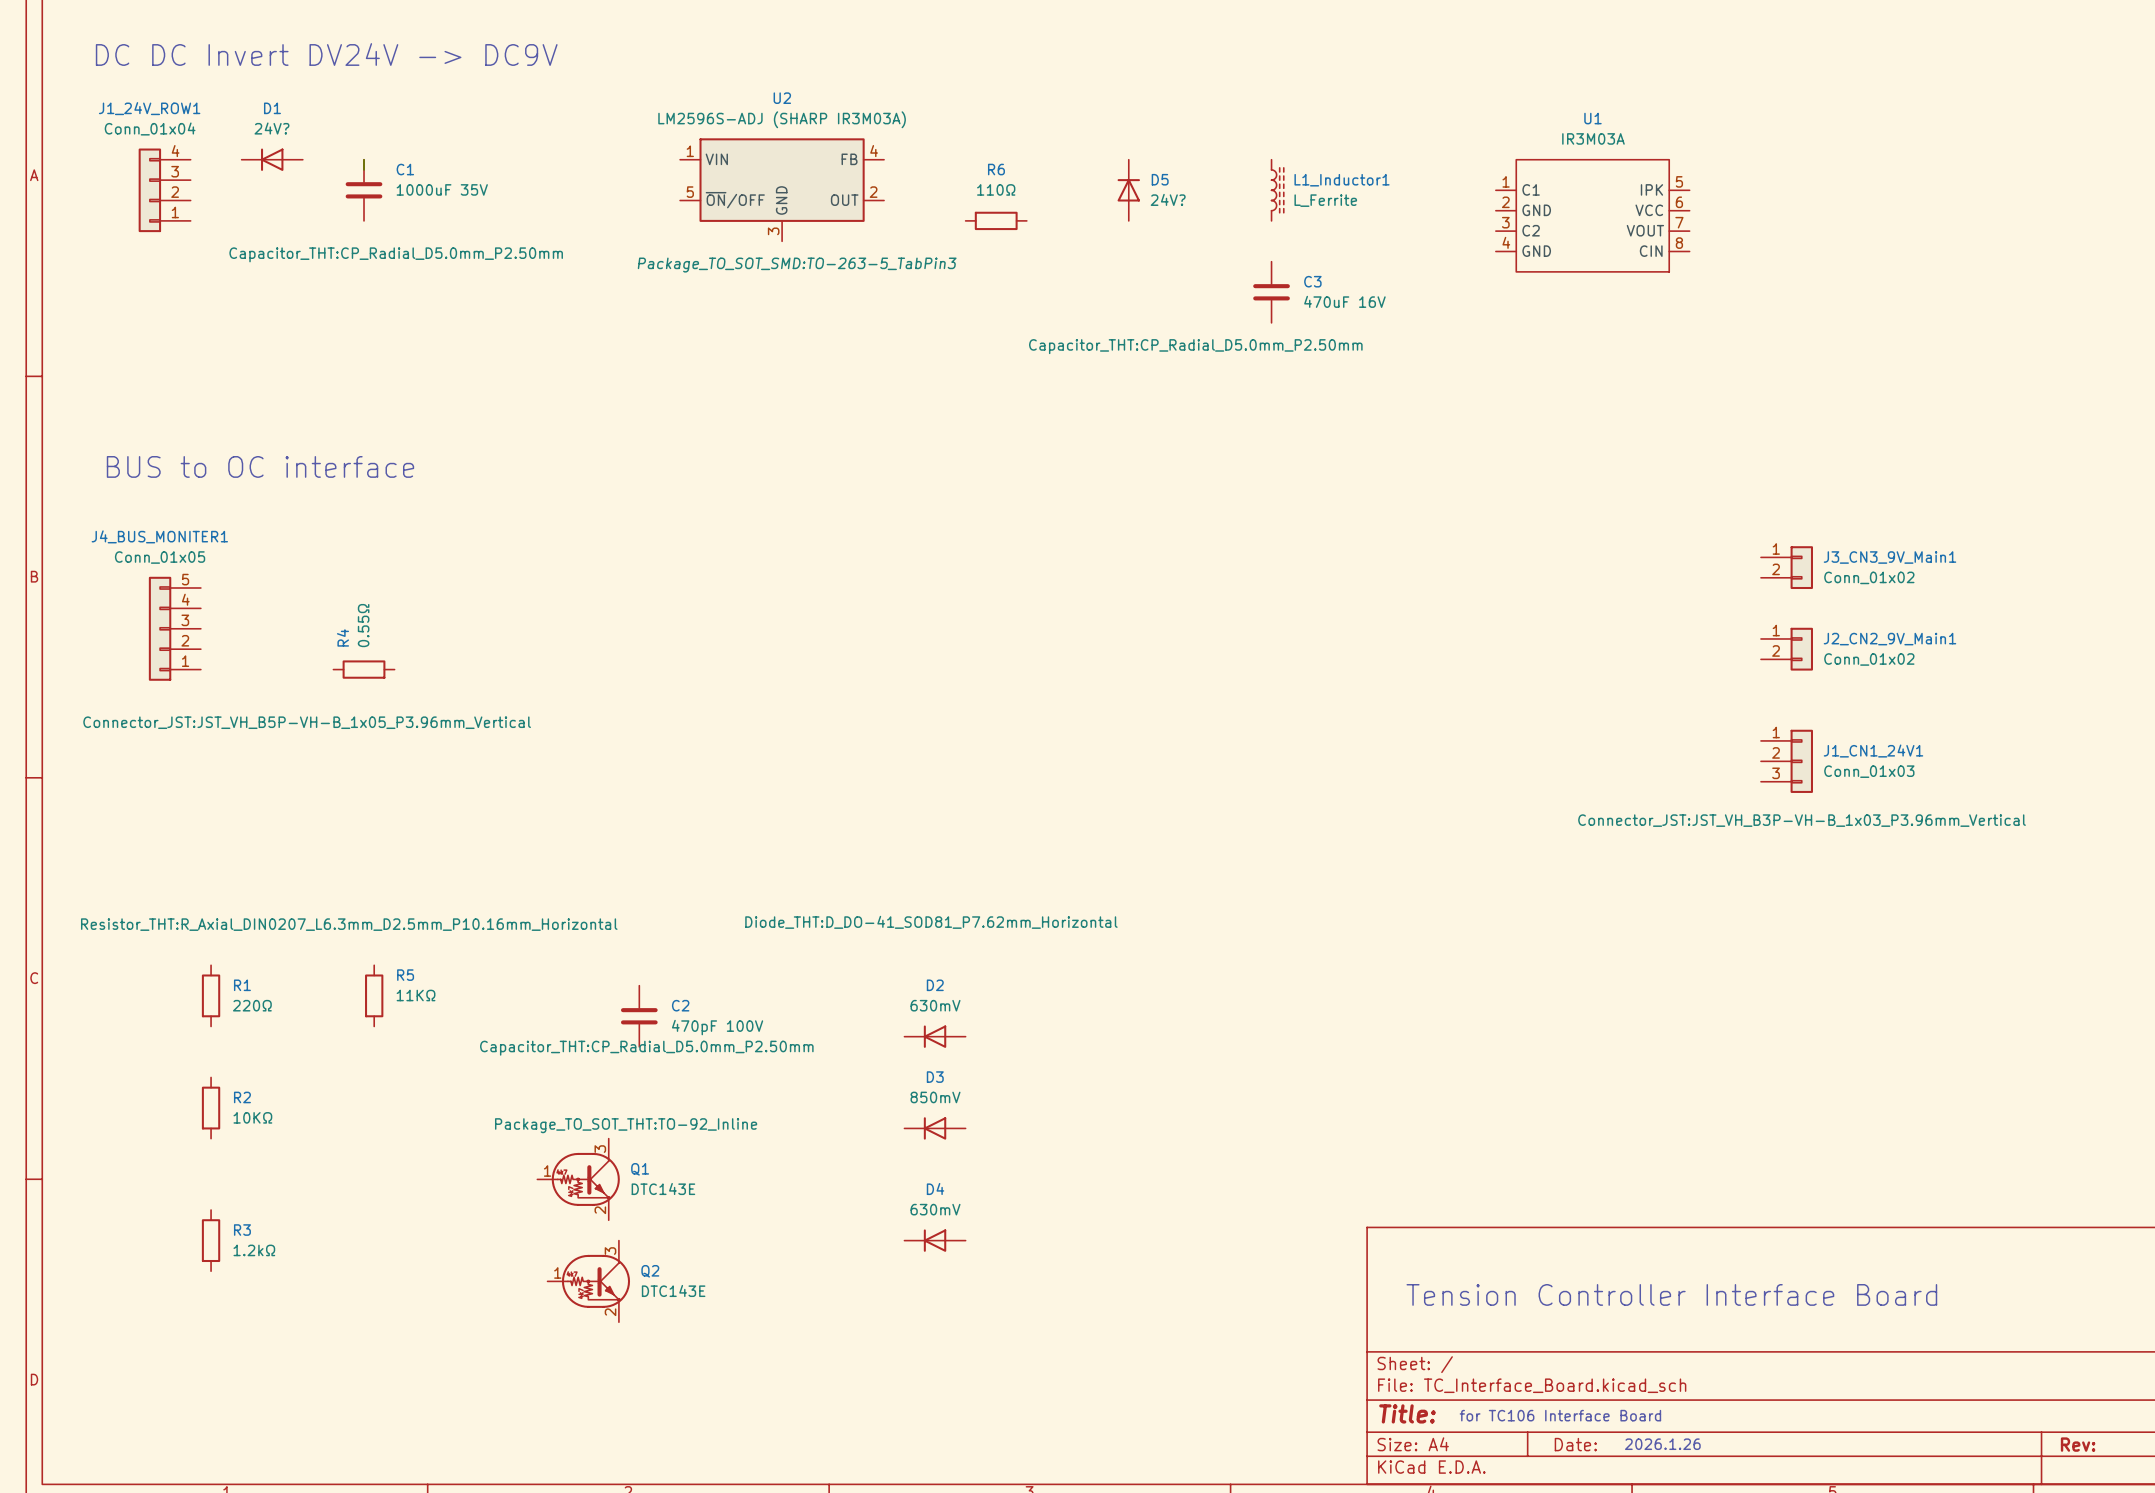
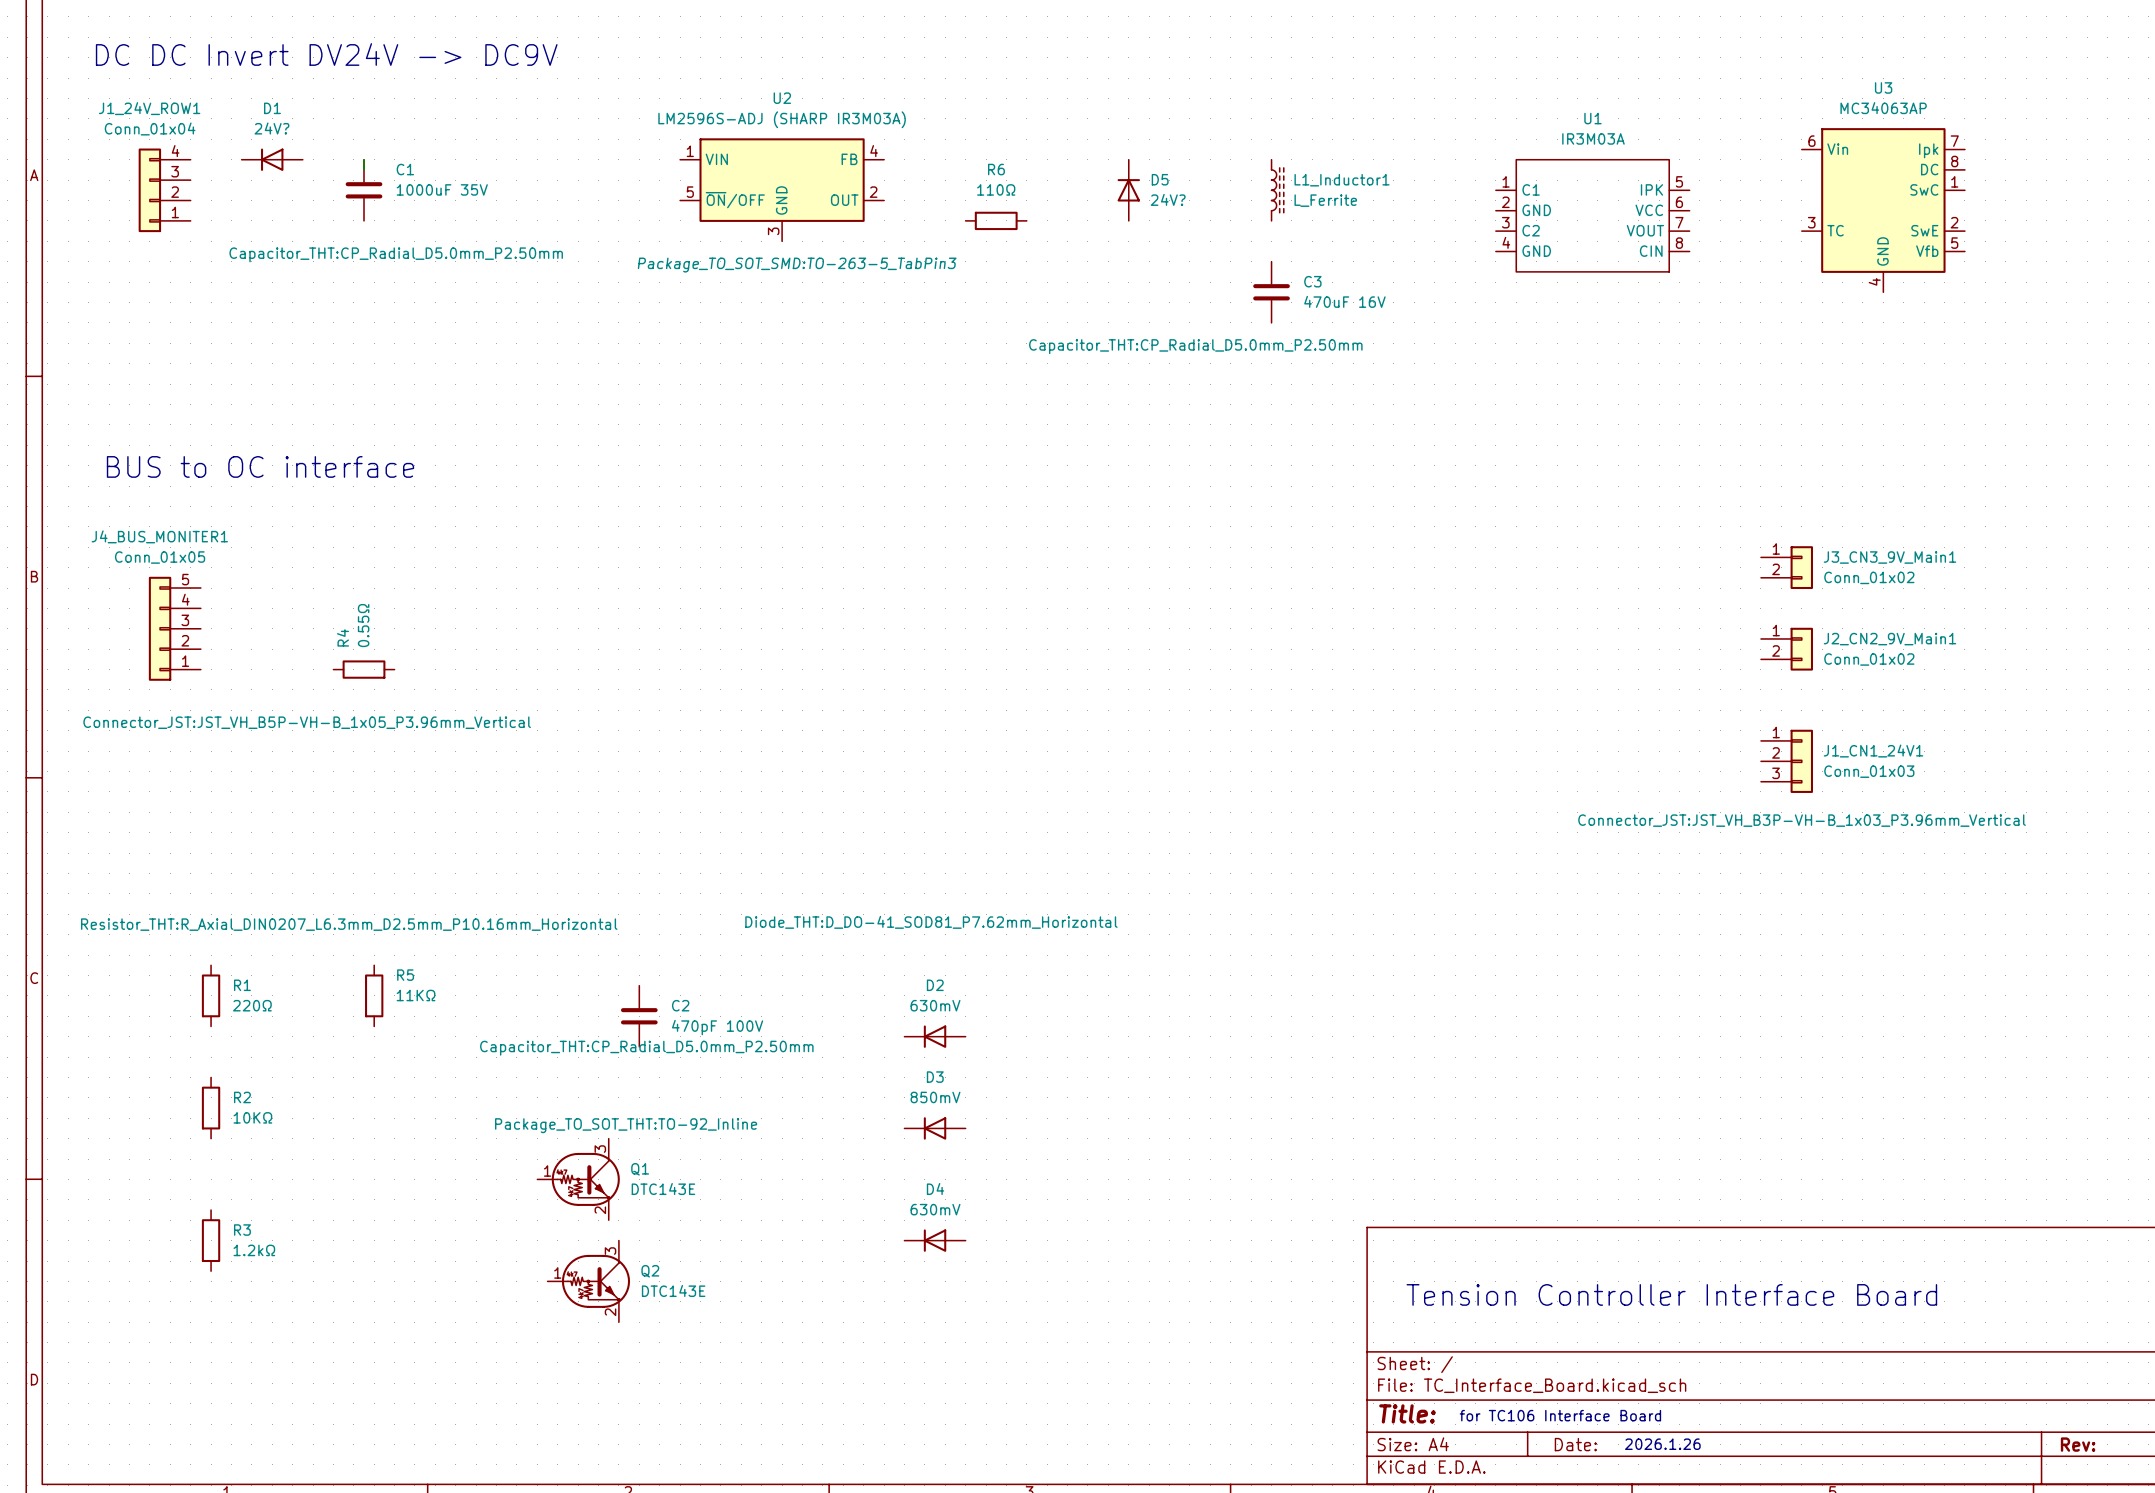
U3: none -> MC34063AP (1883, 210)

